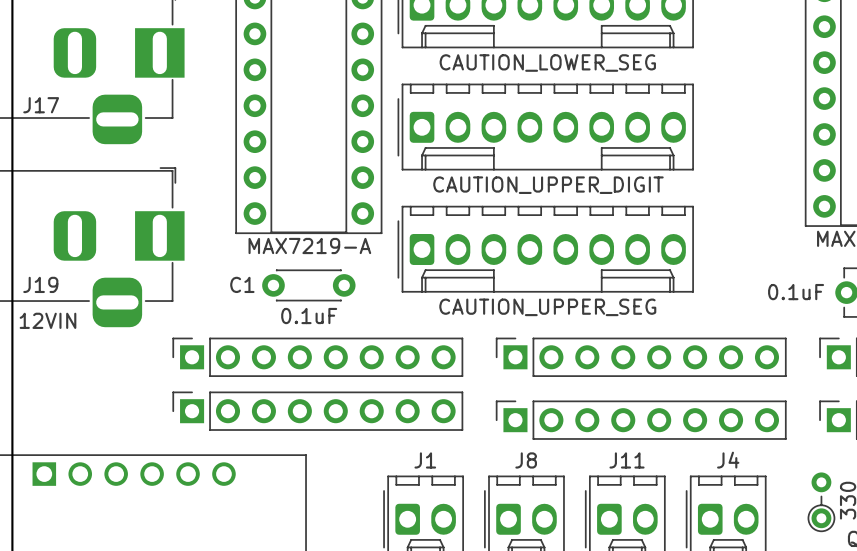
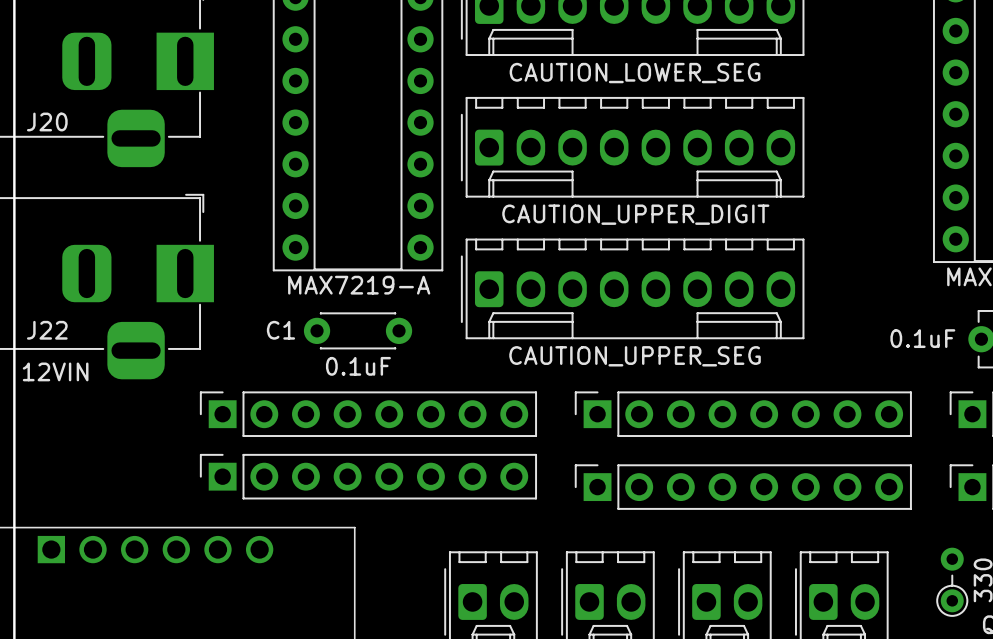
J17 name: J17 (41, 105) -> J20 (47, 121)
J19 name: J19 (40, 284) -> J22 (47, 330)
J1 name: J1 (425, 460) -> none
J8 name: J8 (526, 460) -> none
J11 name: J11 (627, 460) -> none
J4 name: J4 (728, 460) -> none

